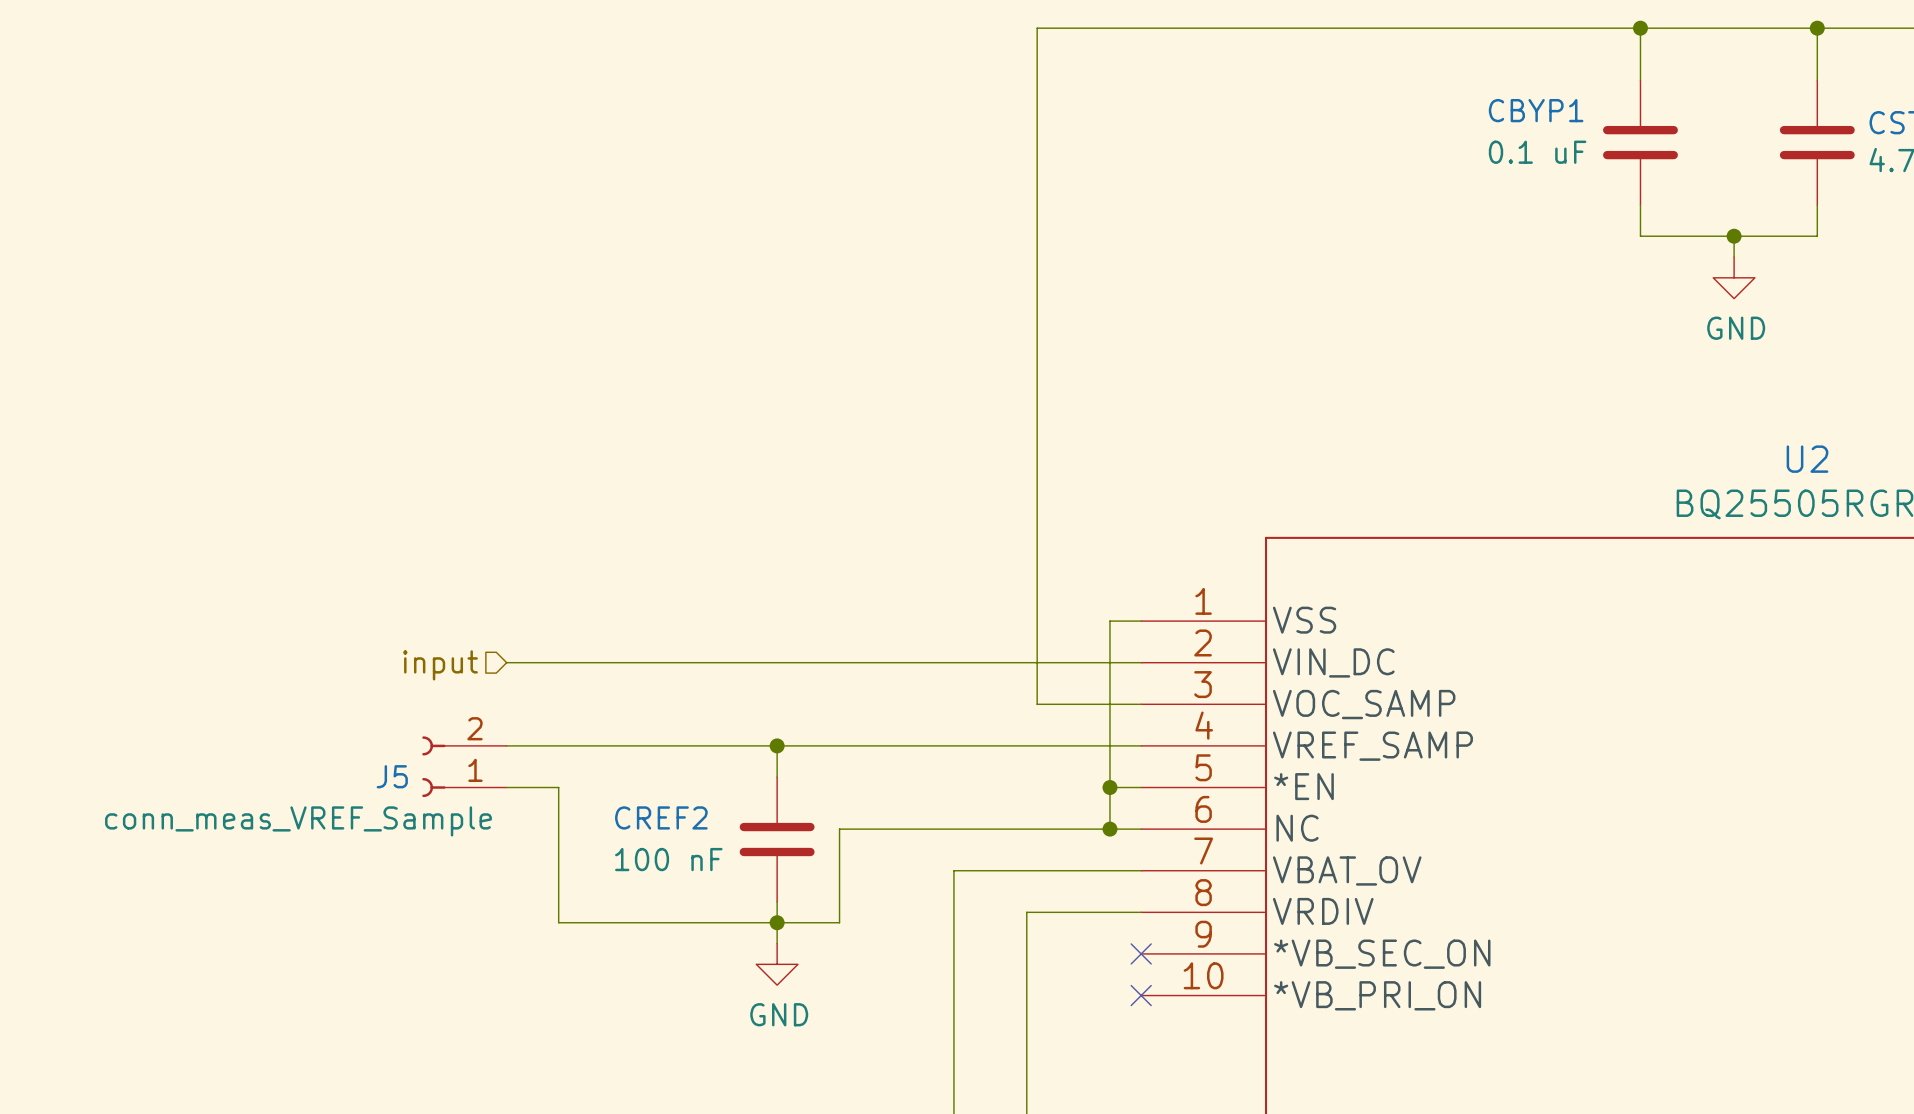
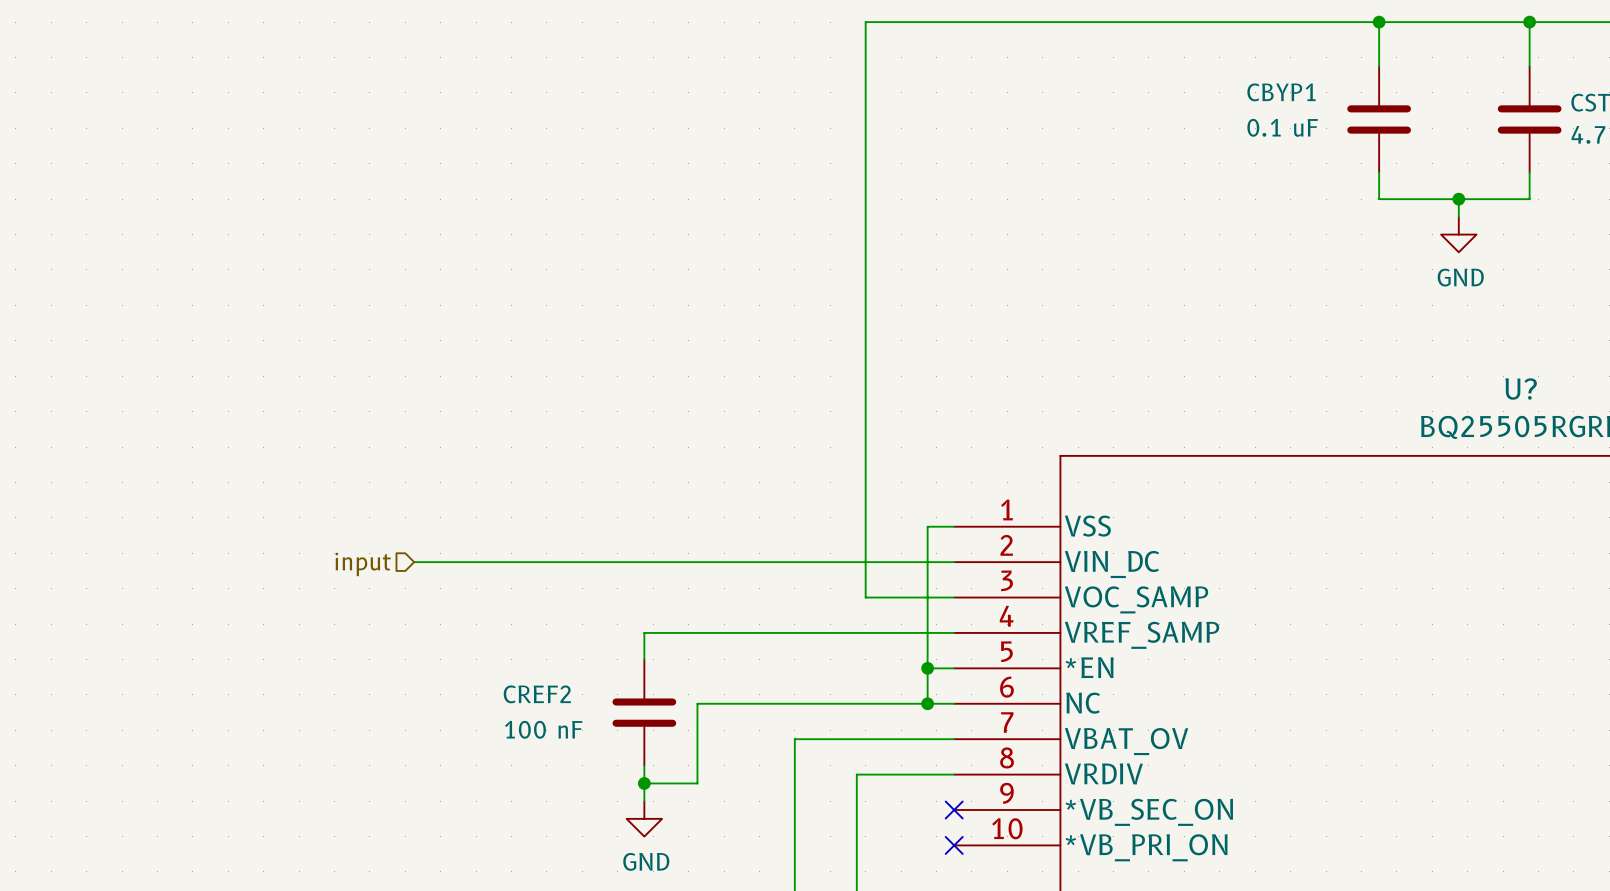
U2 name: U2 (1807, 459) -> U? (1521, 389)
wire: (506, 745) (777, 745) -> none
junction: (777, 745) -> none
J5: conn_meas_VREF_Sample (464, 766) -> none
wire: (506, 787) (558, 787) (558, 922) (777, 922) -> none

